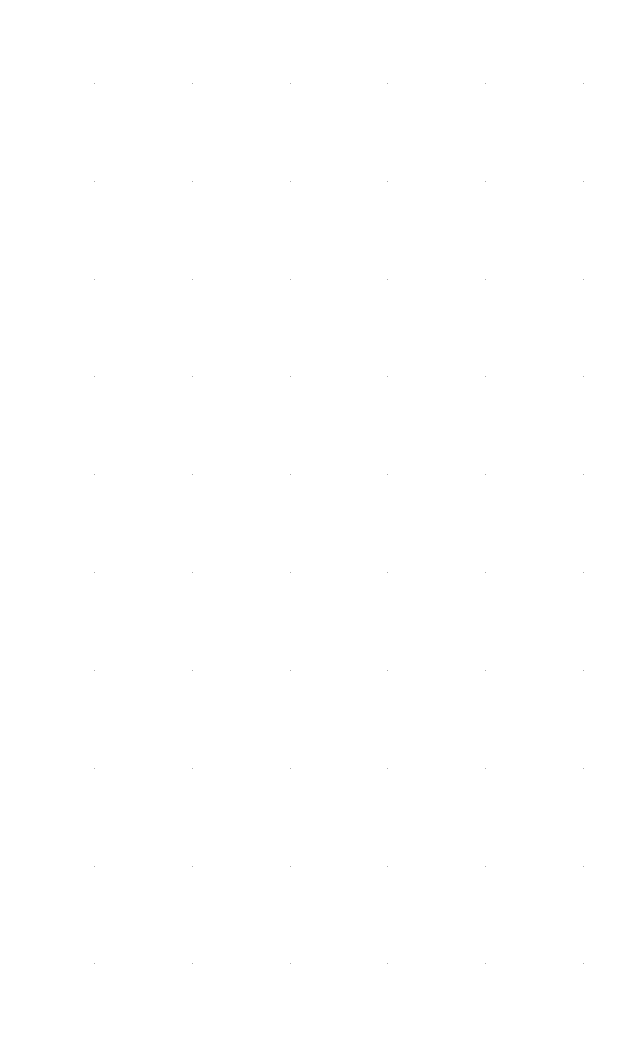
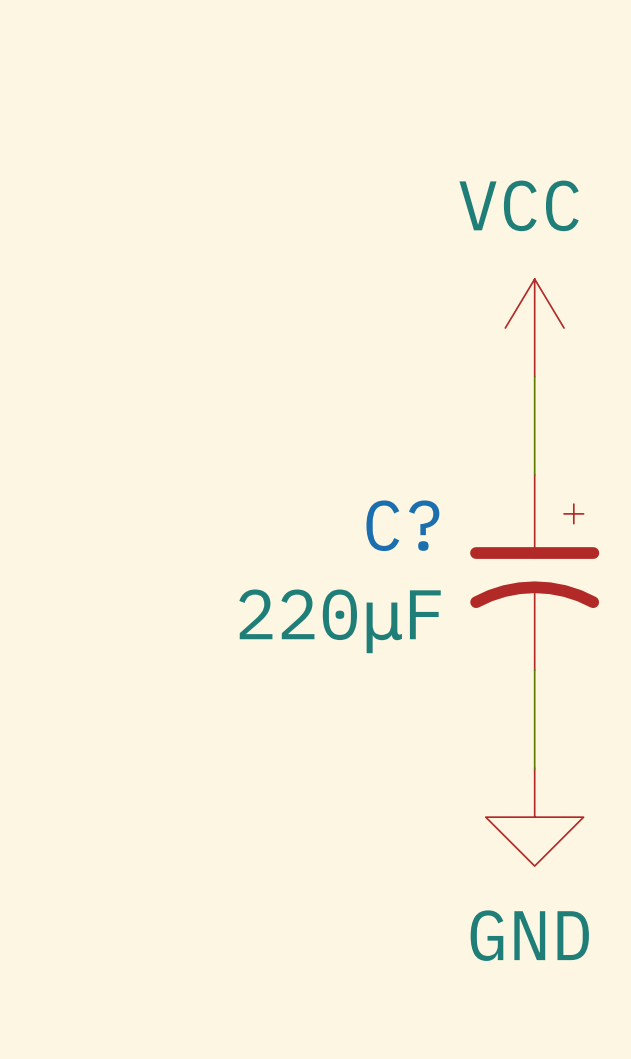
power symbol: none -> VCC (534, 328)
wire: none -> (534, 376) (534, 474)
C?: none -> 220μF (534, 572)
wire: none -> (534, 670) (534, 768)
power symbol: none -> GND (534, 817)

